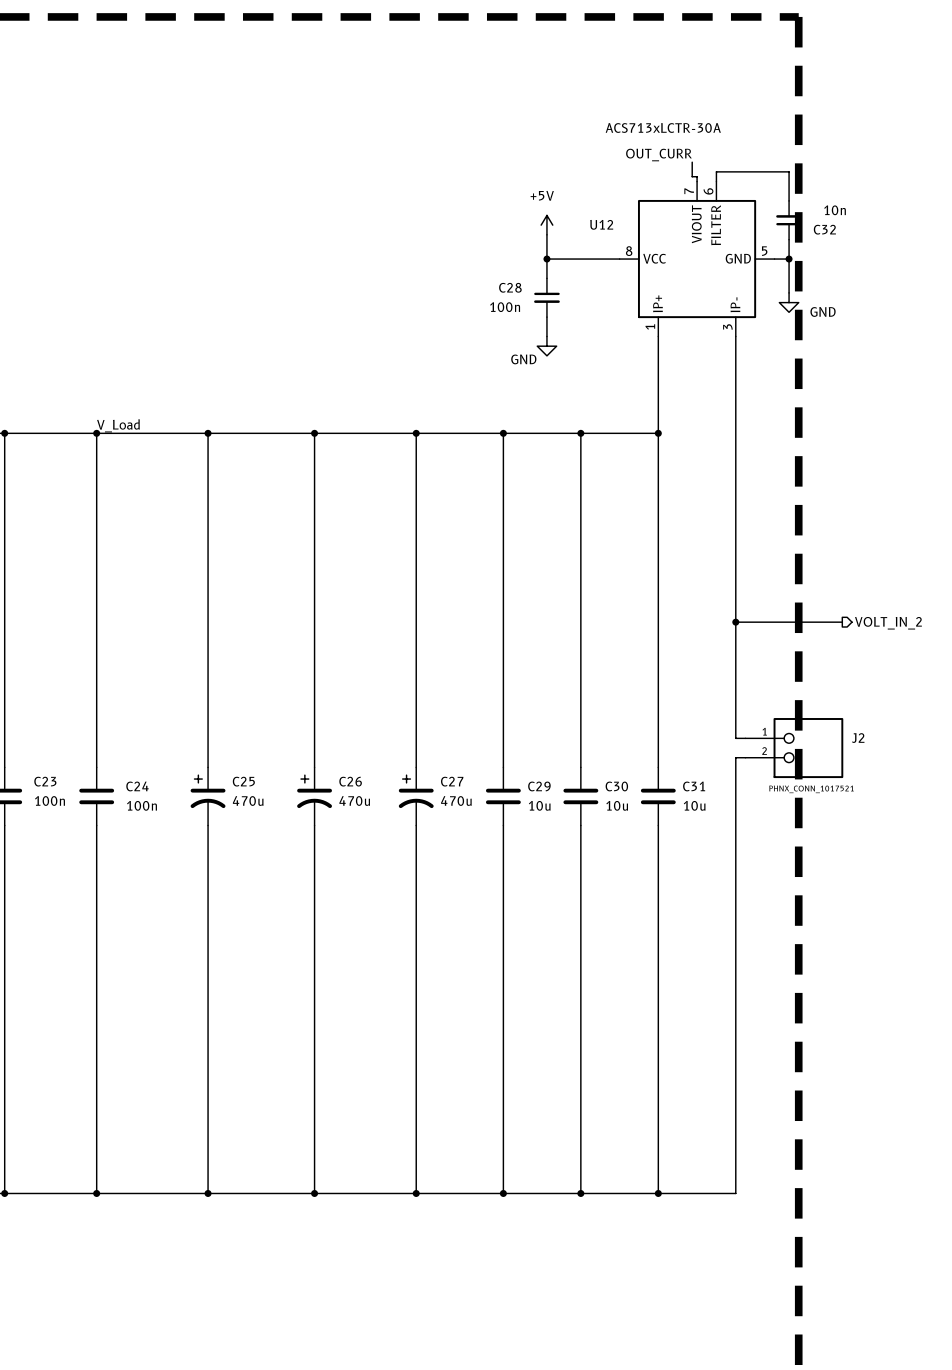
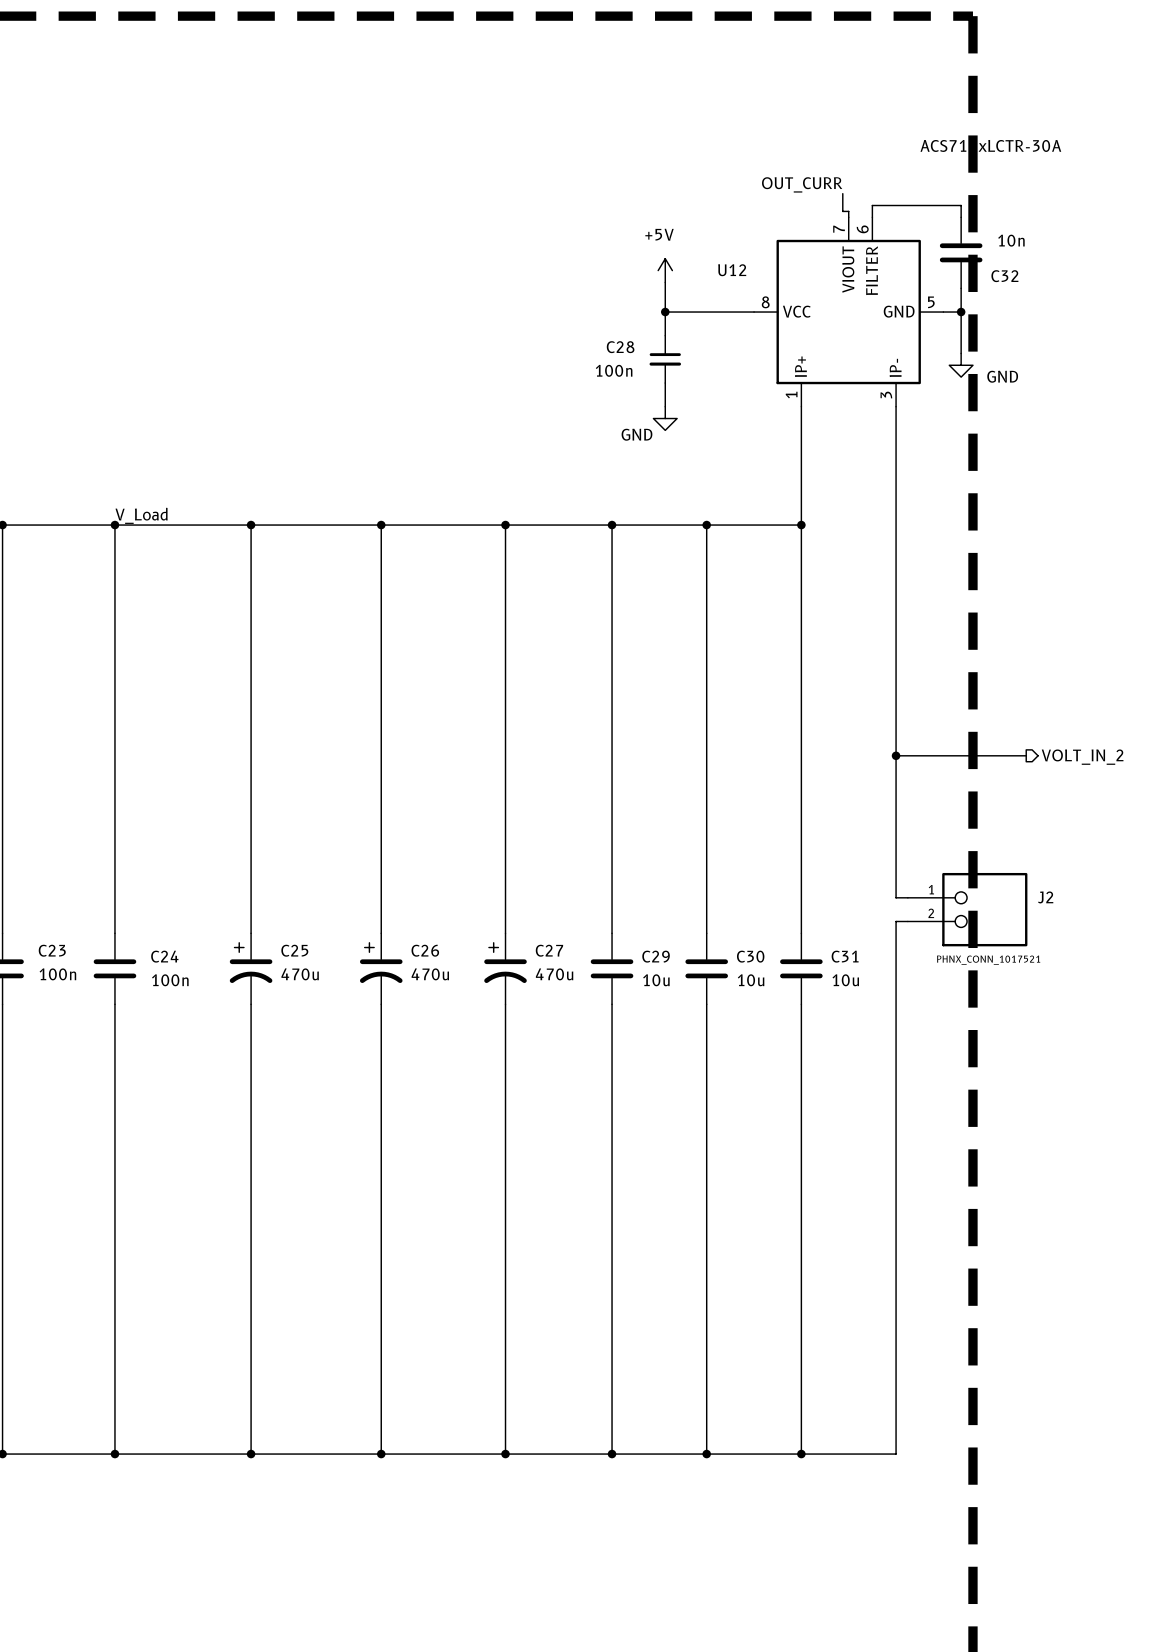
U12 value position: ACS713xLCTR-30A (663, 128) -> ACS713xLCTR-30A (990, 145)
C32 symbol: [776, 200, 802, 240] -> [939, 217, 983, 289]

